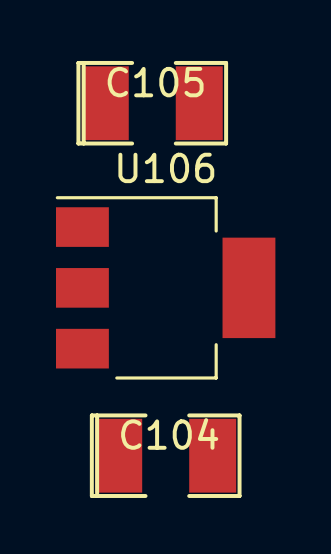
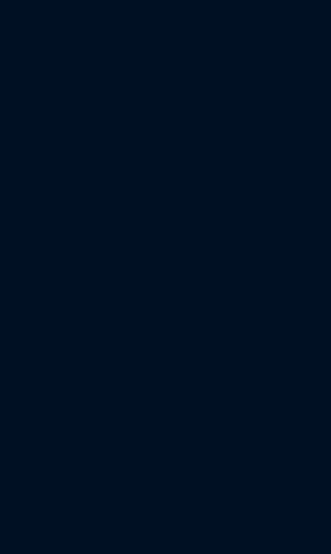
C105: (152, 103) -> none
U106: (165, 287) -> none
C104: (165, 455) -> none

